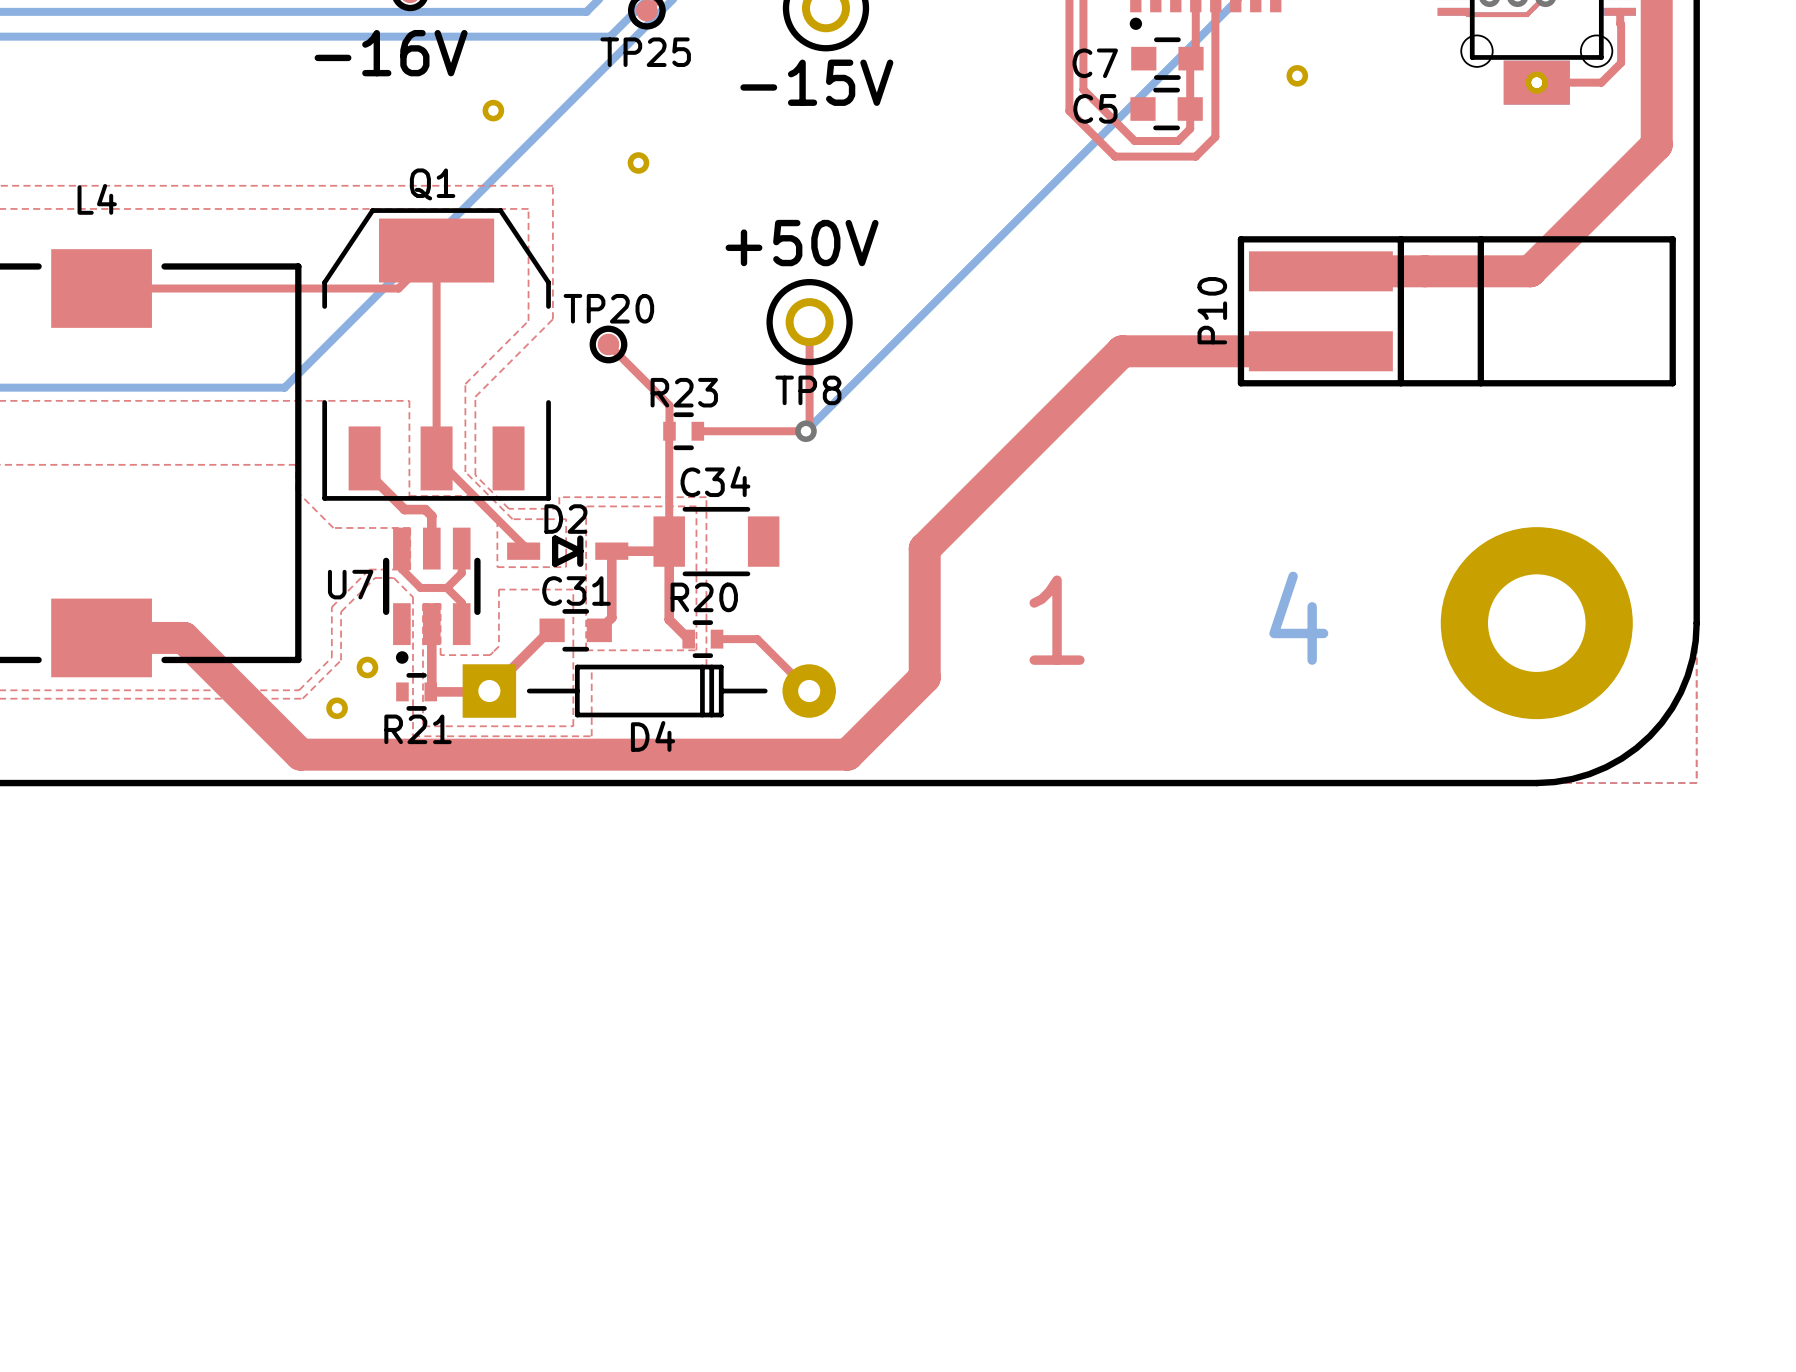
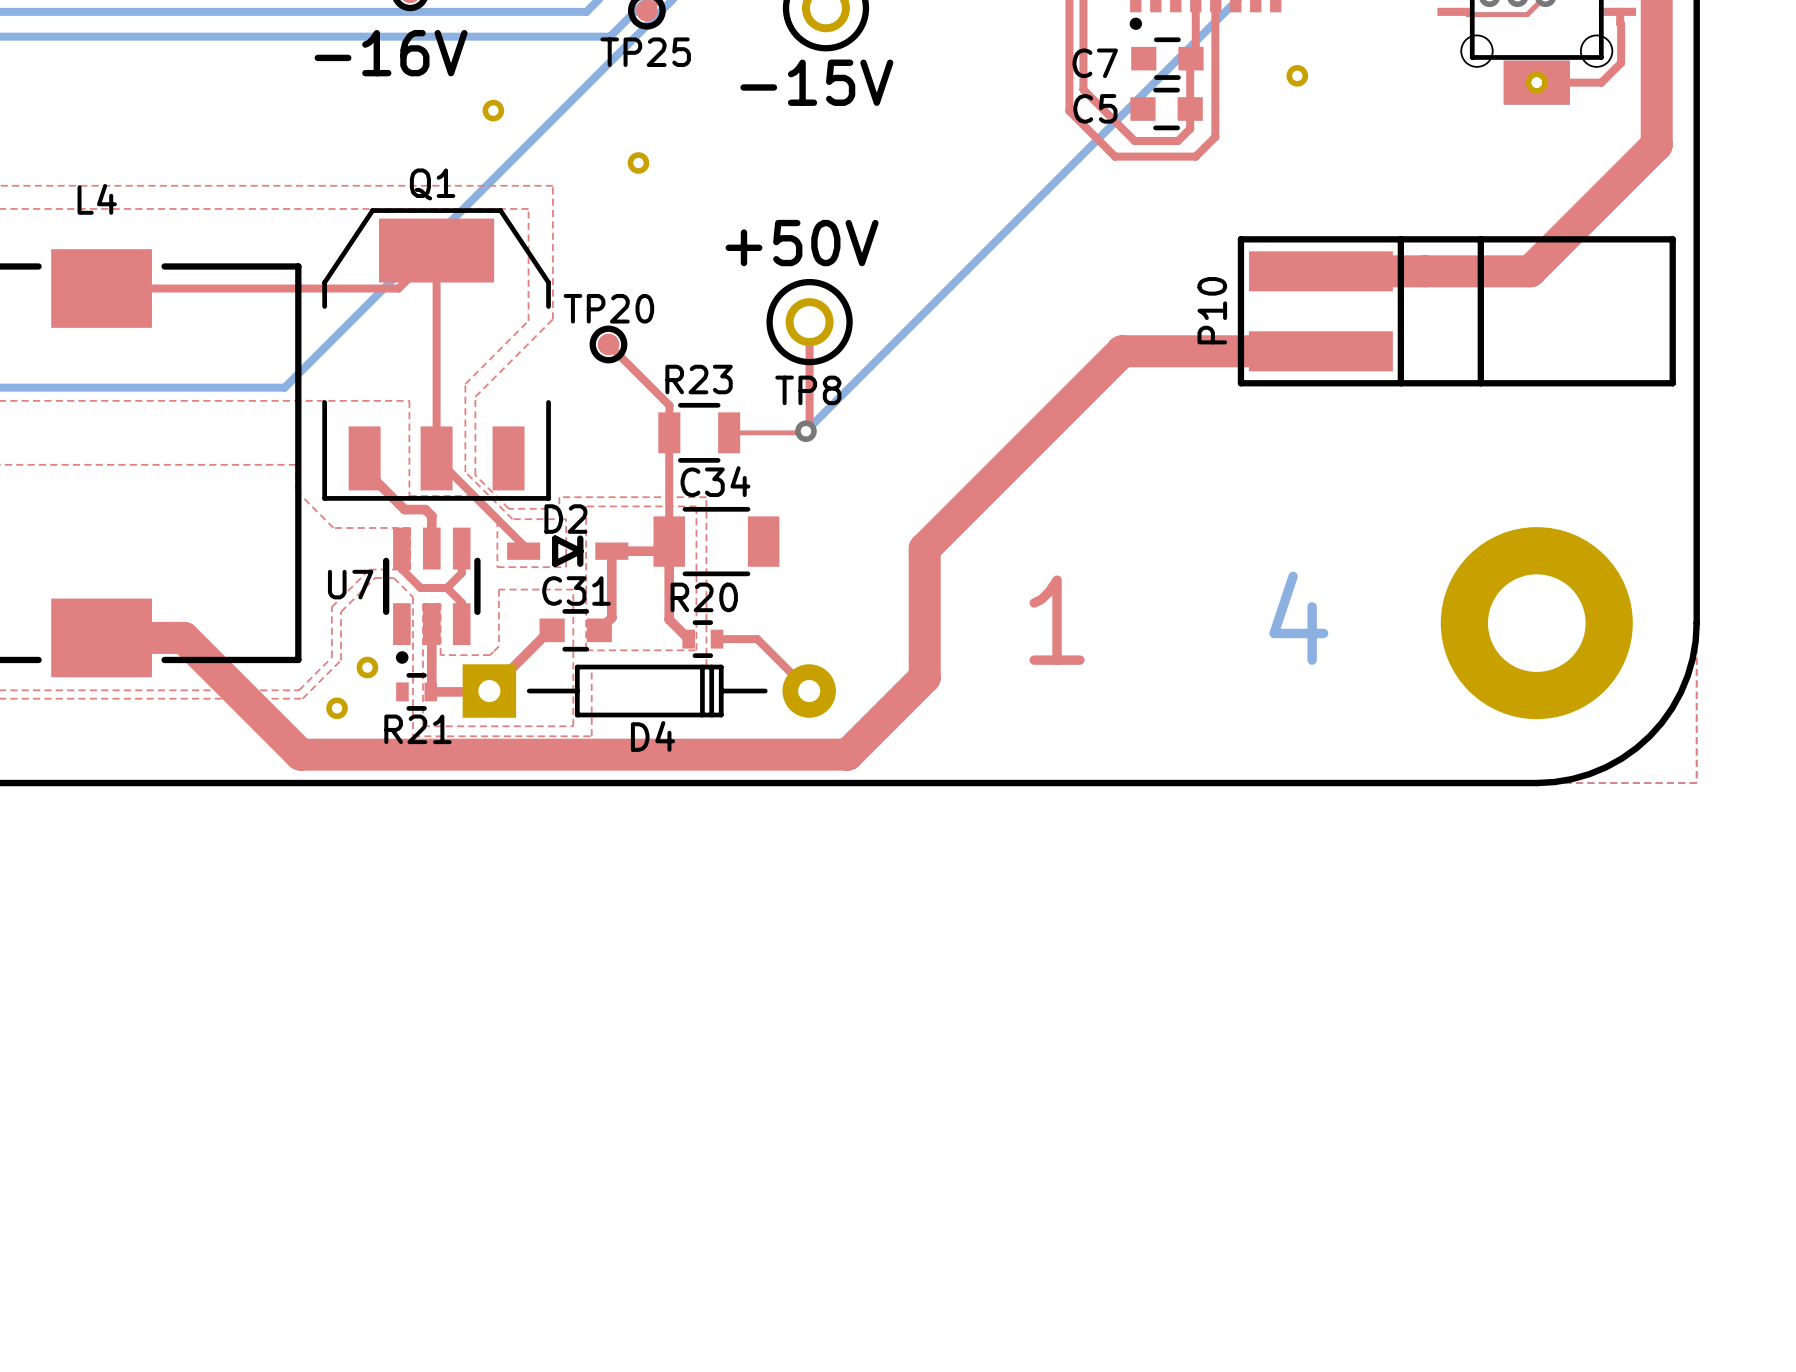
R23 footprint: [663, 412, 705, 451] -> [658, 402, 741, 463]
top track: (697, 431) (805, 431) -> (729, 432) (804, 432) (805, 431)

